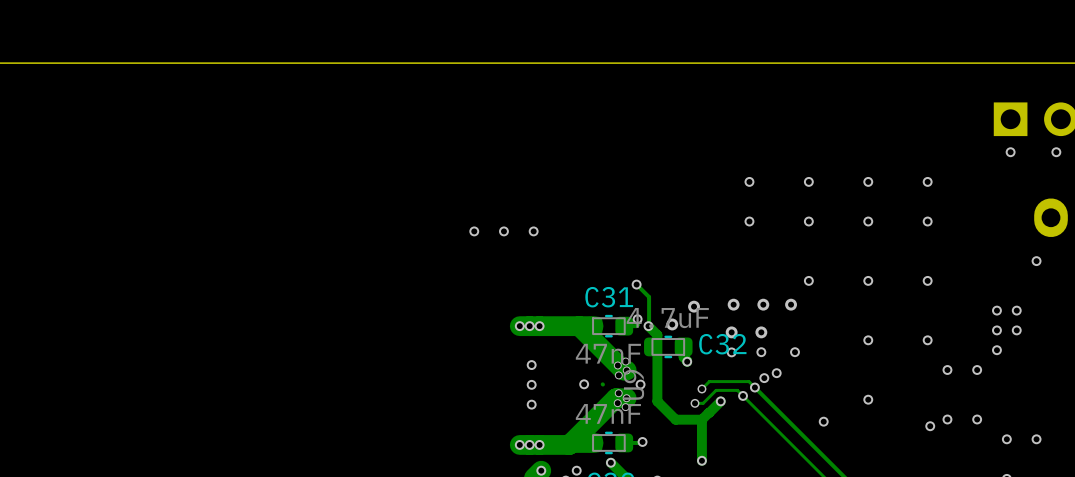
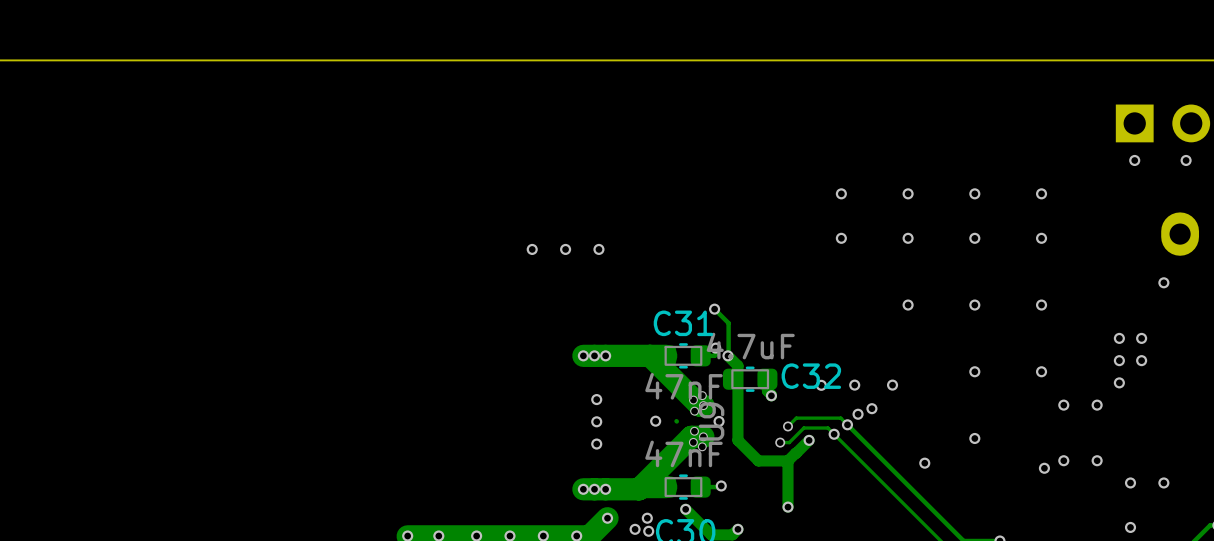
via: (733, 304) -> none
via: (763, 304) -> none
via: (791, 304) -> none
via: (694, 306) -> none
via: (672, 324) -> none
via: (731, 332) -> none
via: (761, 332) -> none

